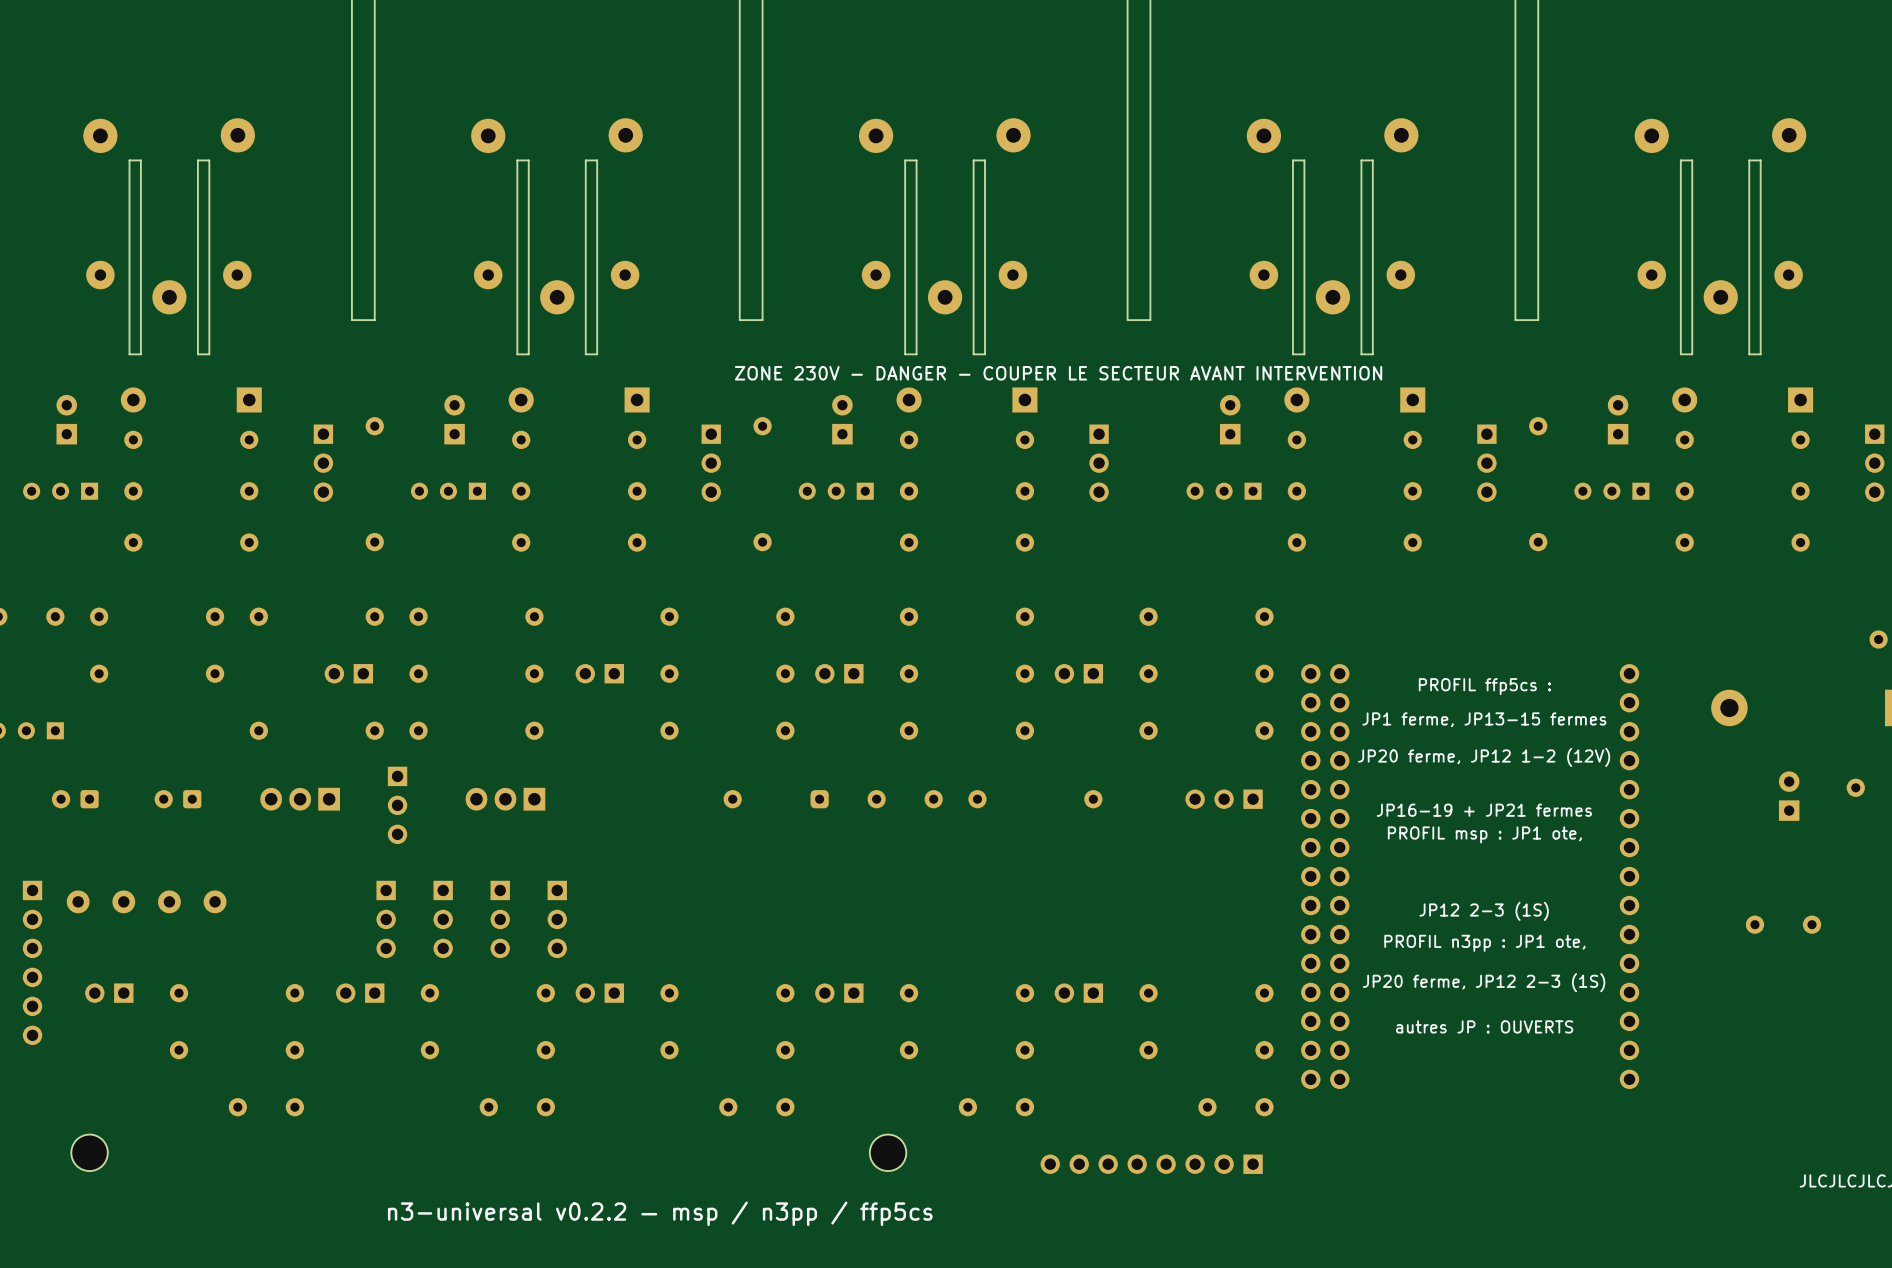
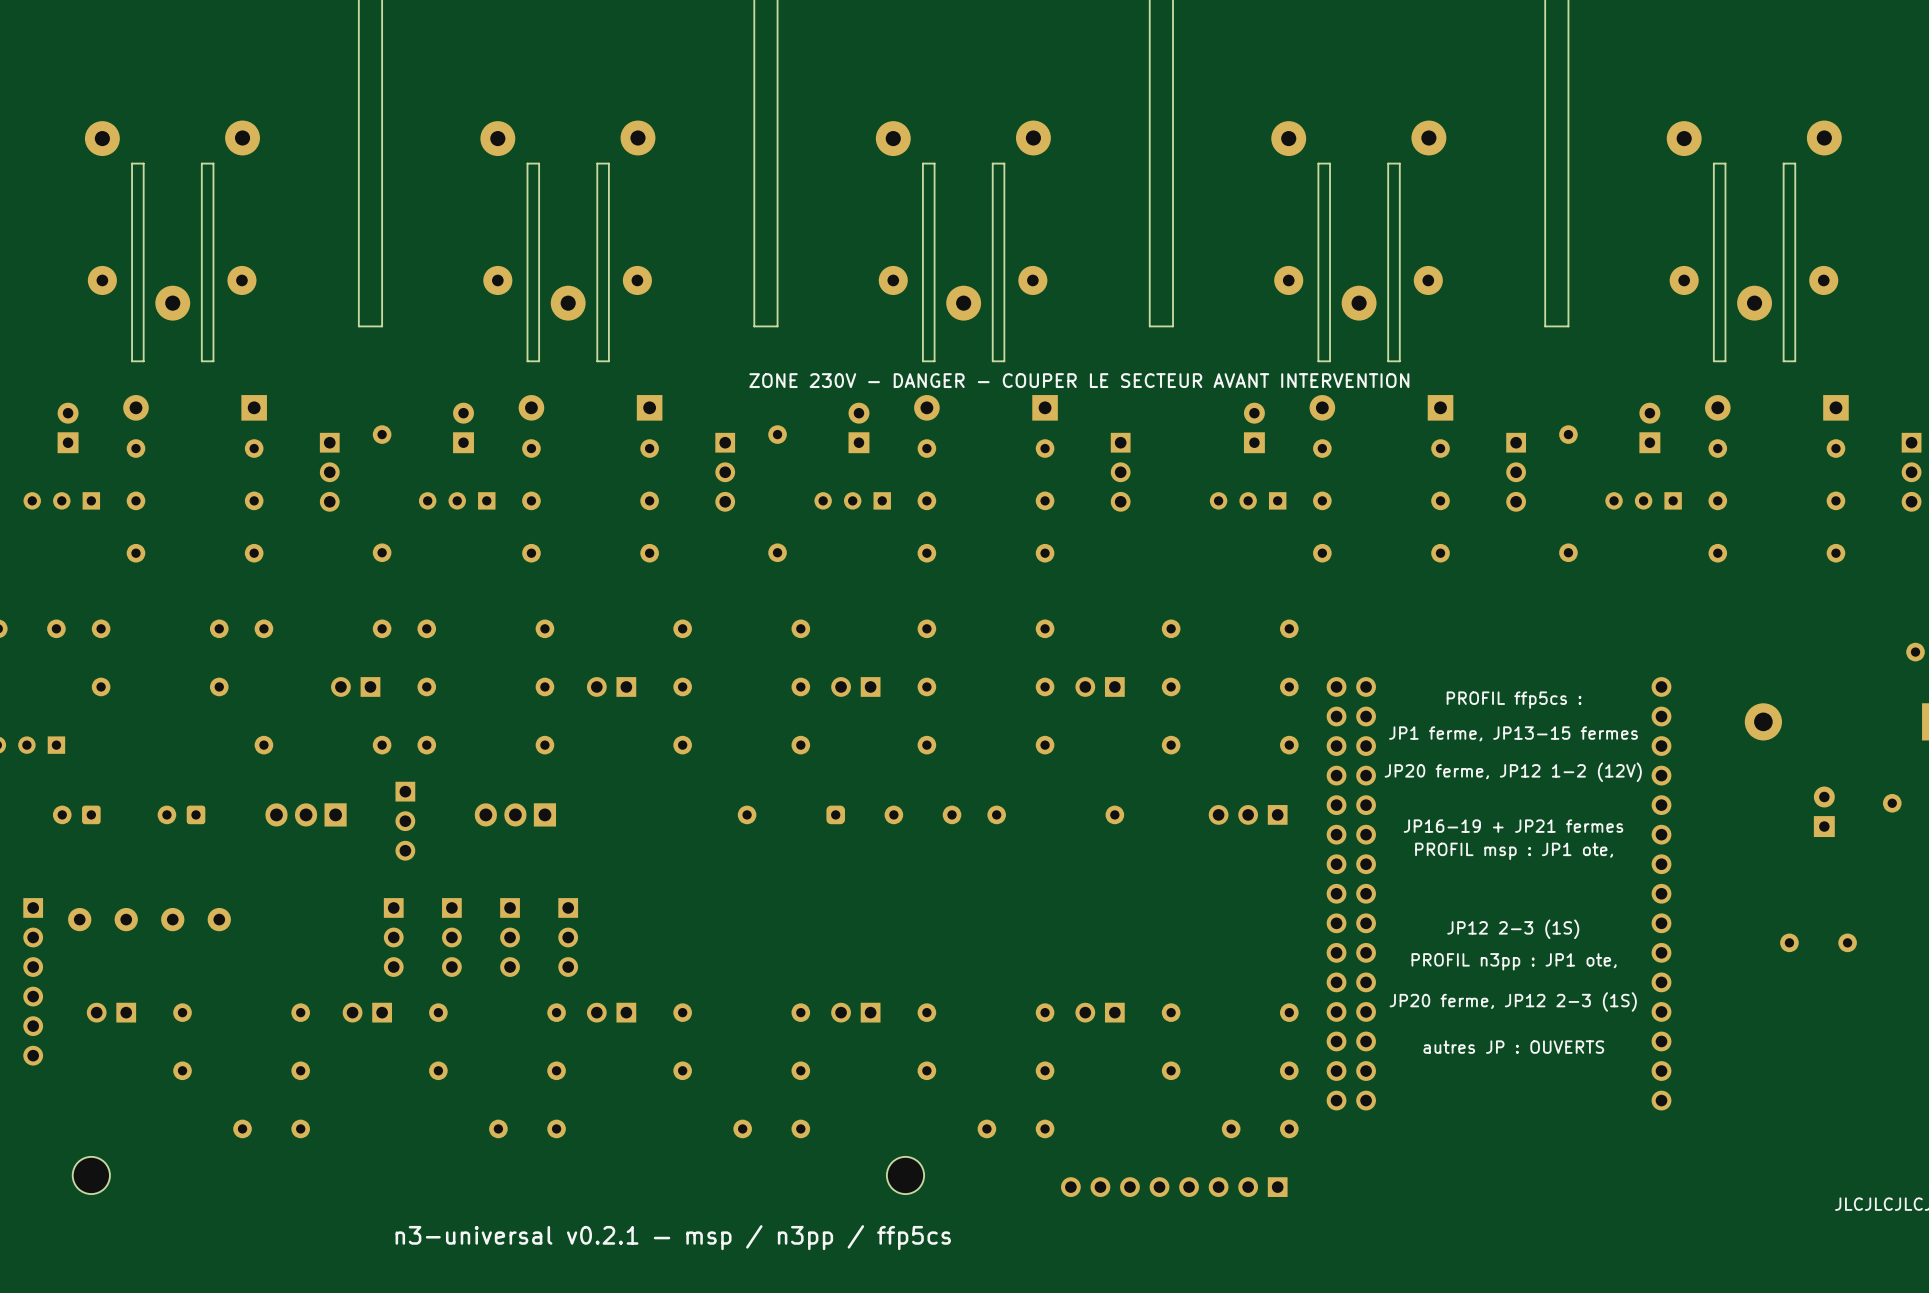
text: n3-universal v0.2.2 — msp / n3pp / ffp5cs (660, 1213) -> n3-universal v0.2.1 — msp / n3pp / ffp5cs (673, 1237)

